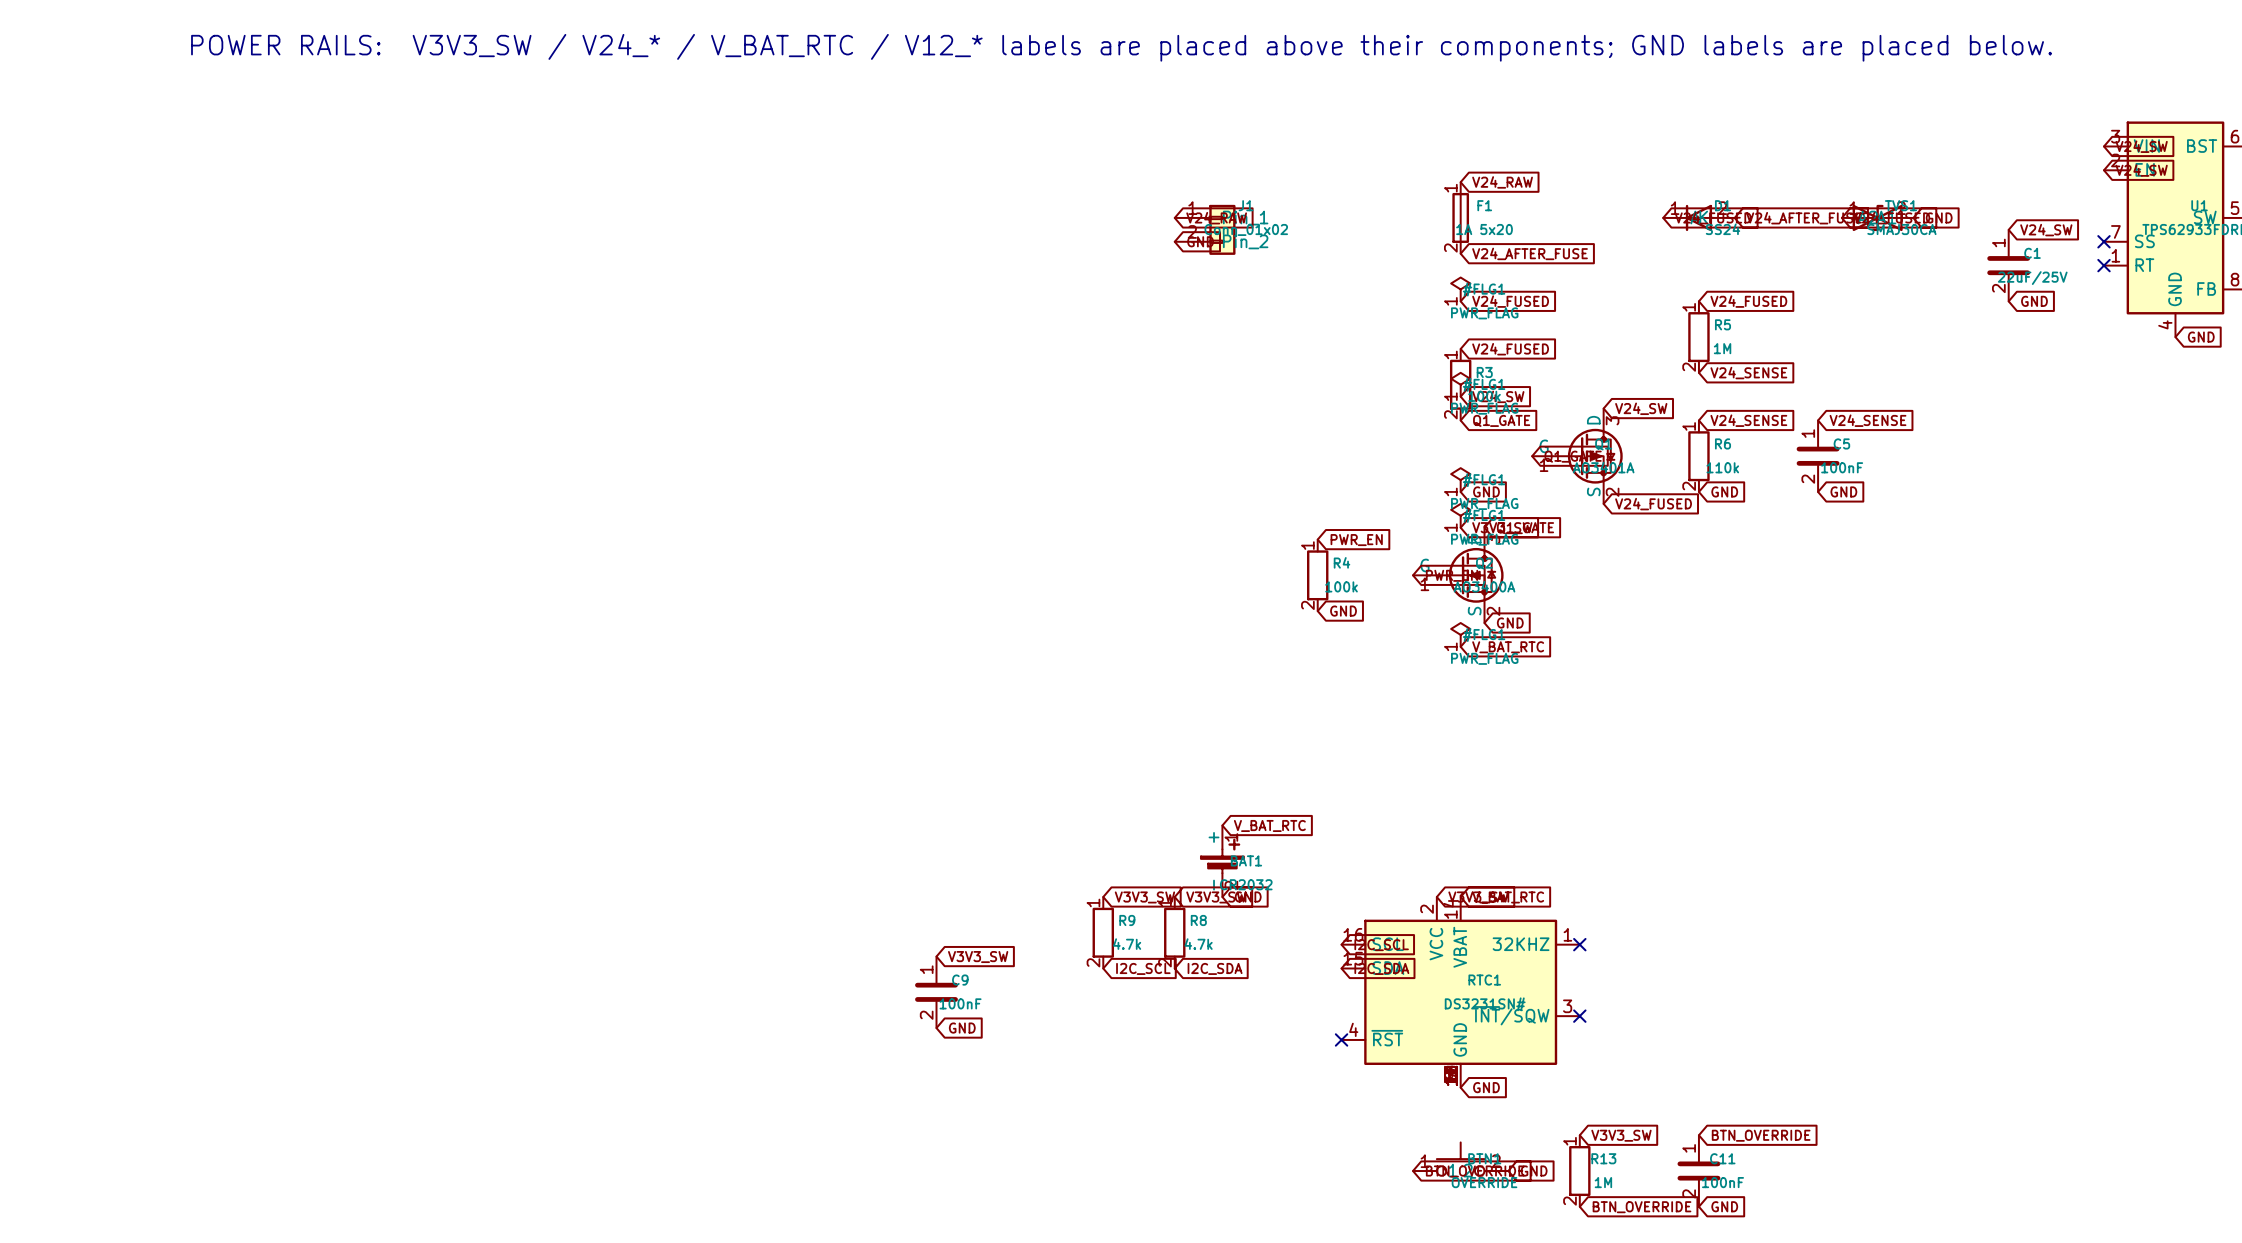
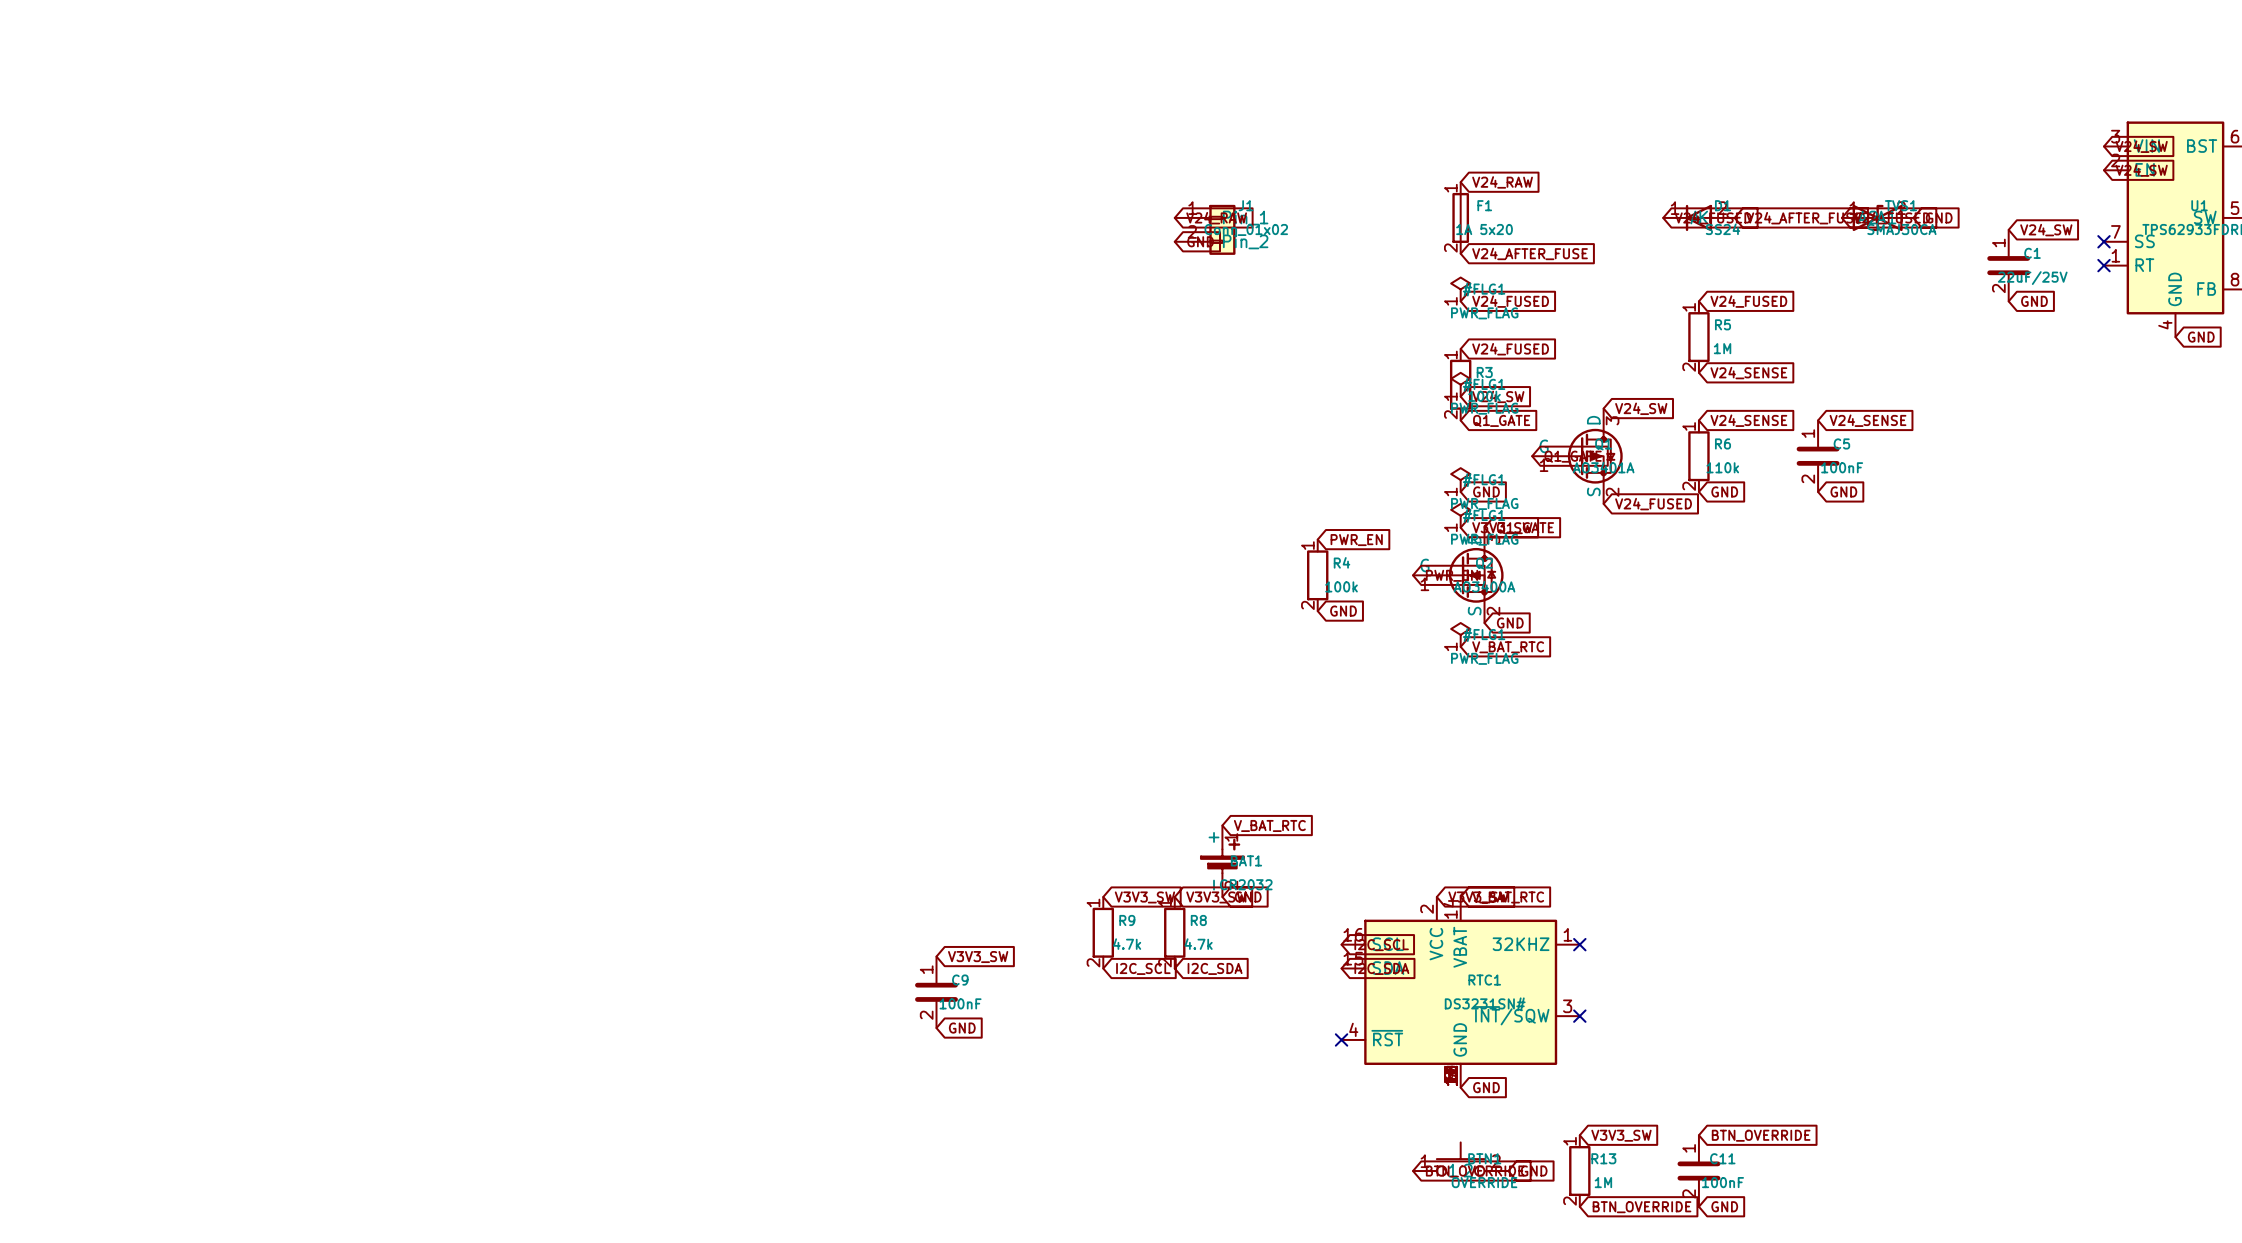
text: POWER RAILS: V3V3_SW / V24_* / V_BAT_RTC / V12_* labels are placed above their components; GND labels are placed below. (1121, 47) -> none

